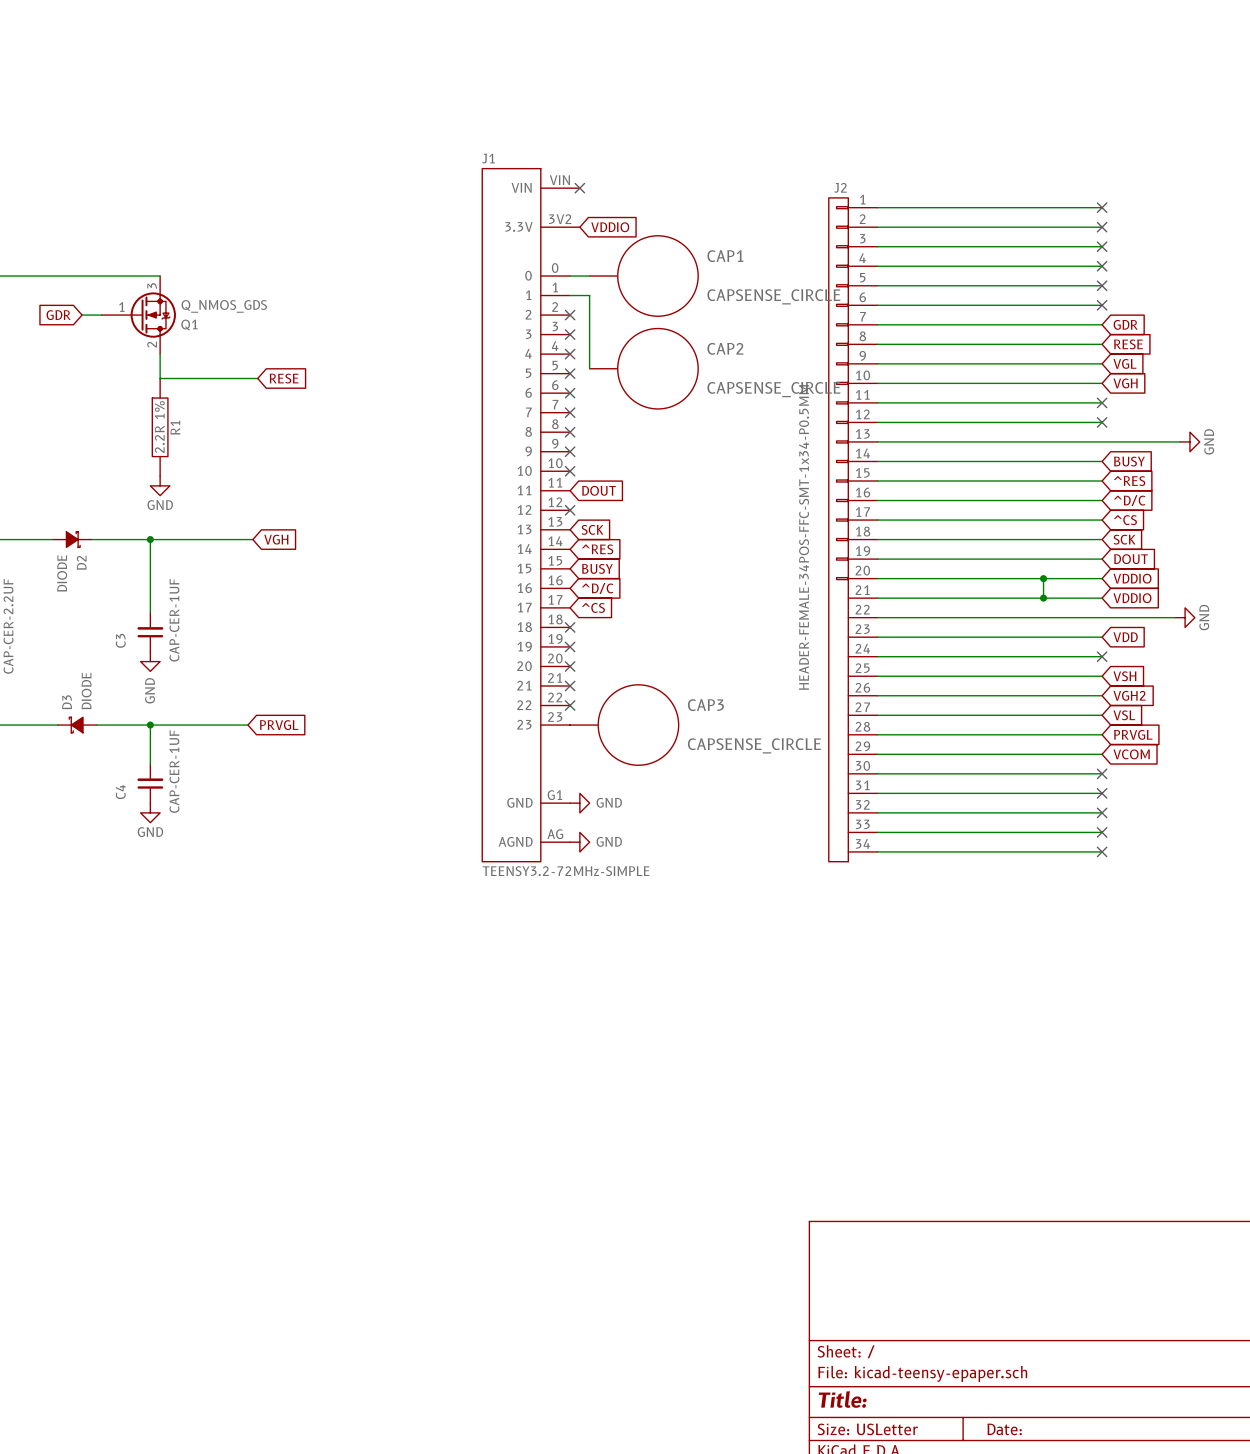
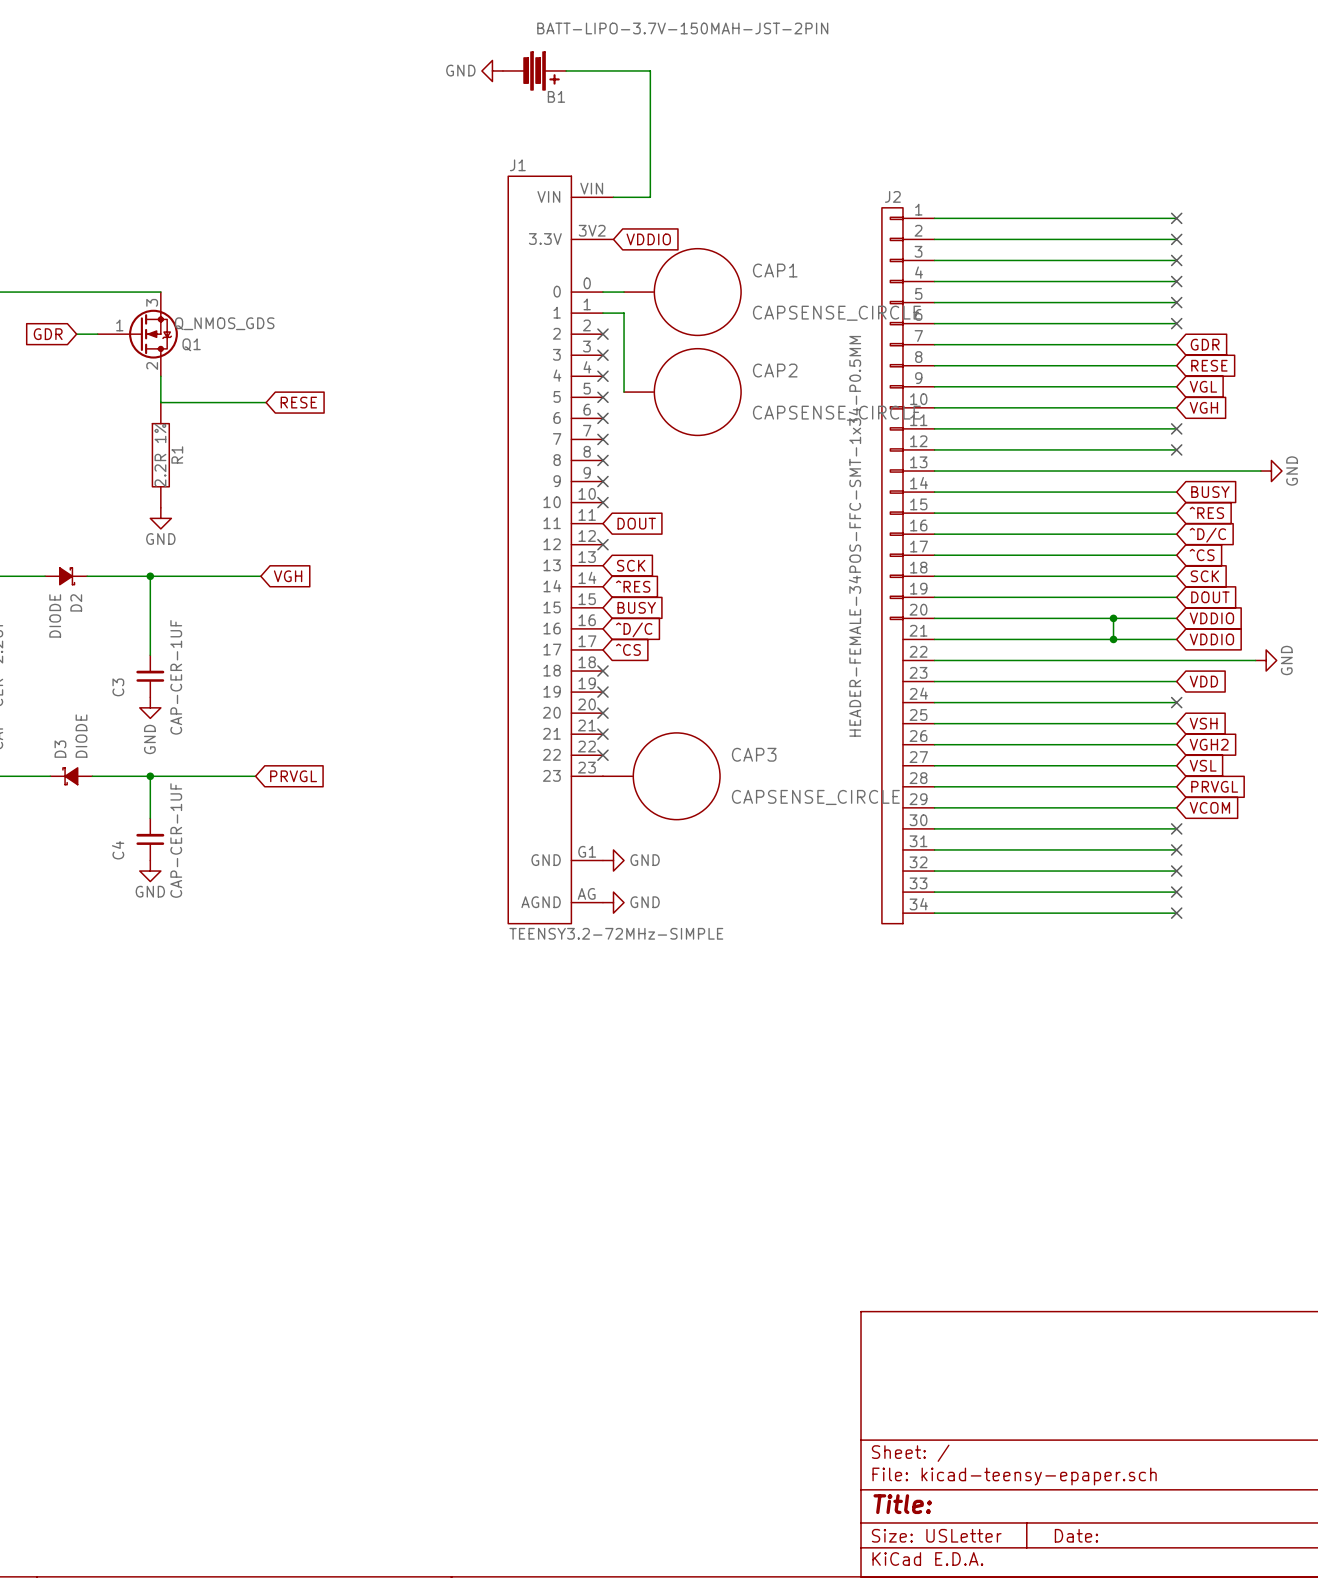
power symbol: none -> GND (492, 70)
B1: none -> BATT-LIPO-3.7V-150MAH-JST-2PIN (534, 70)
wire: none -> (566, 70) (650, 70) (650, 197) (613, 197)
no-connect mark: (579, 188) -> none

